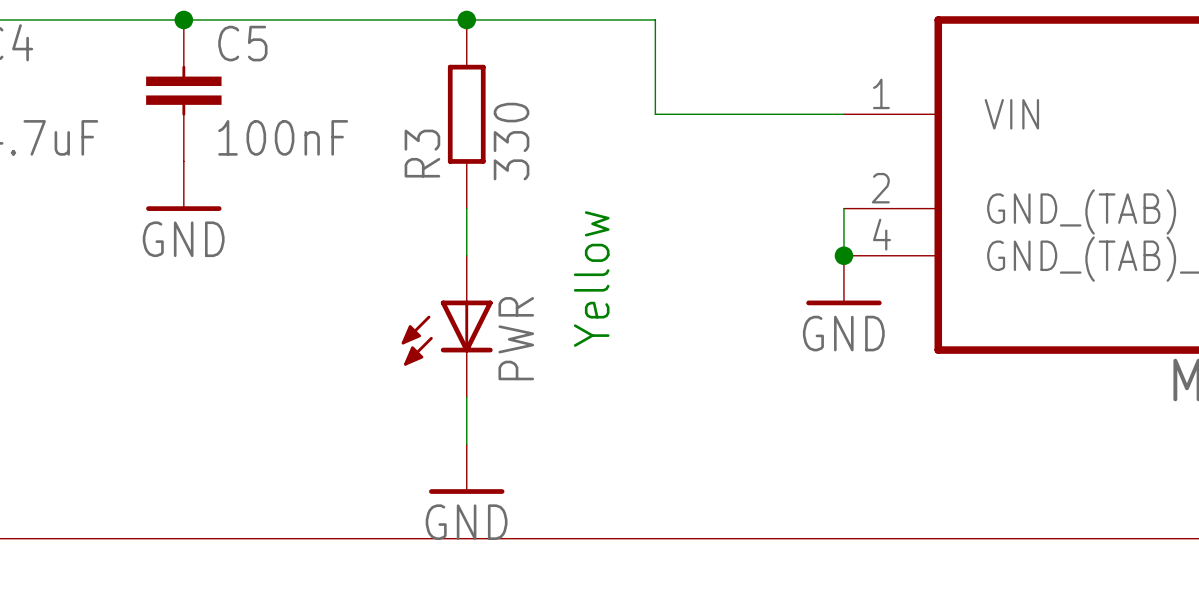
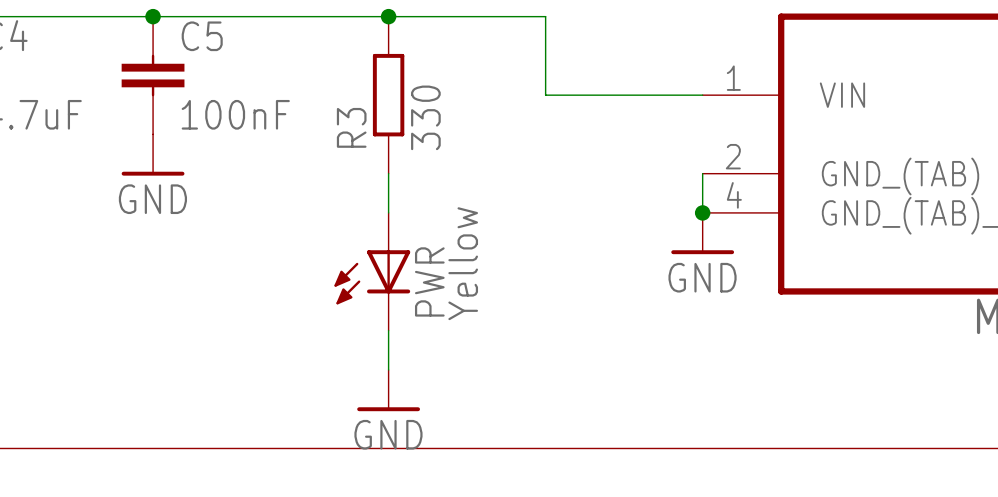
text: Yellow (591, 279) -> none
PWR value: none -> Yellow (463, 263)

